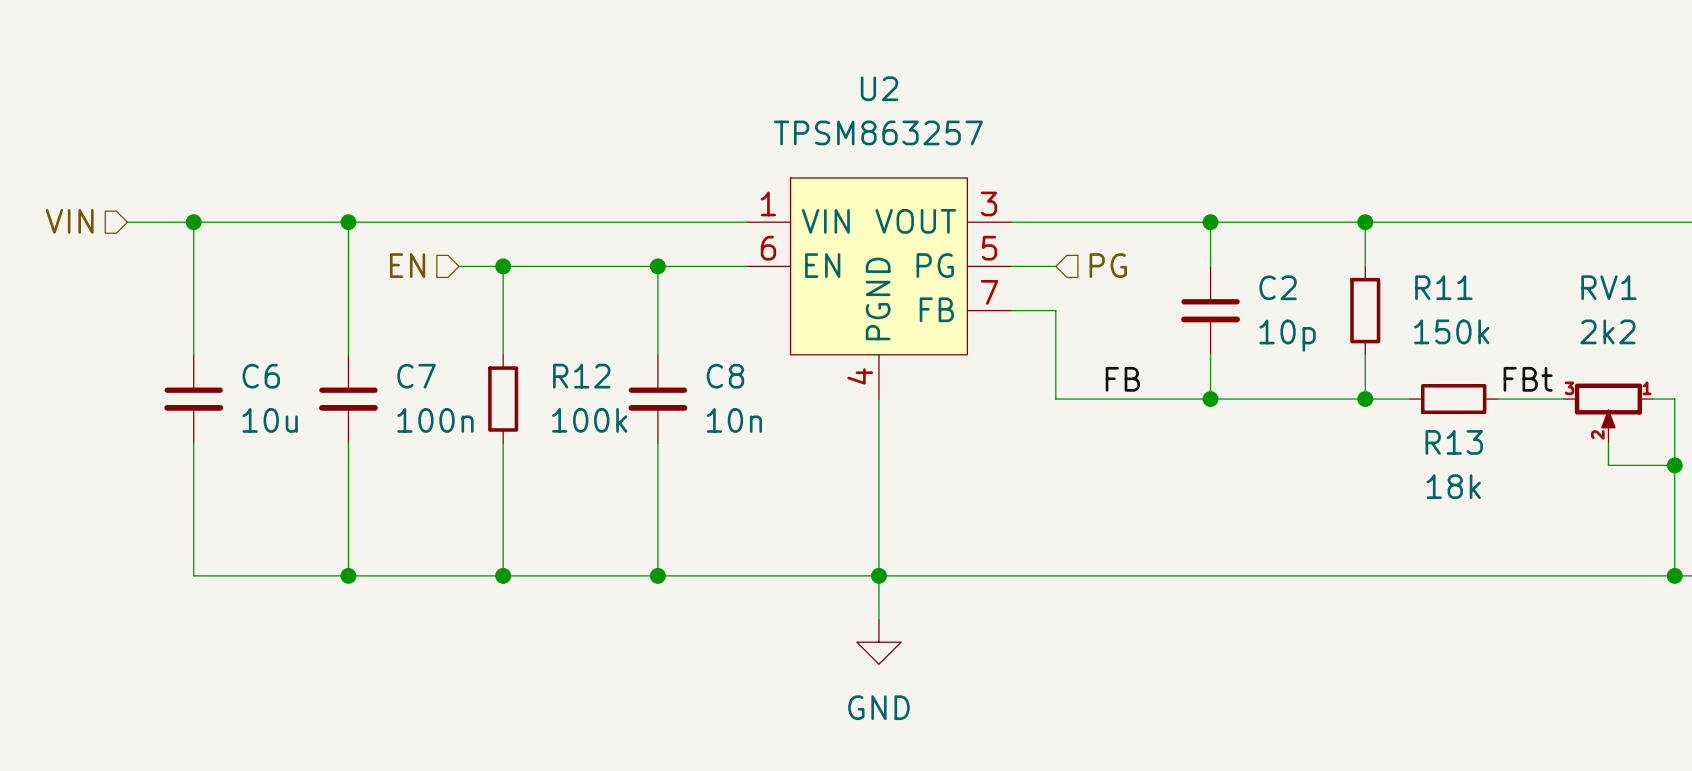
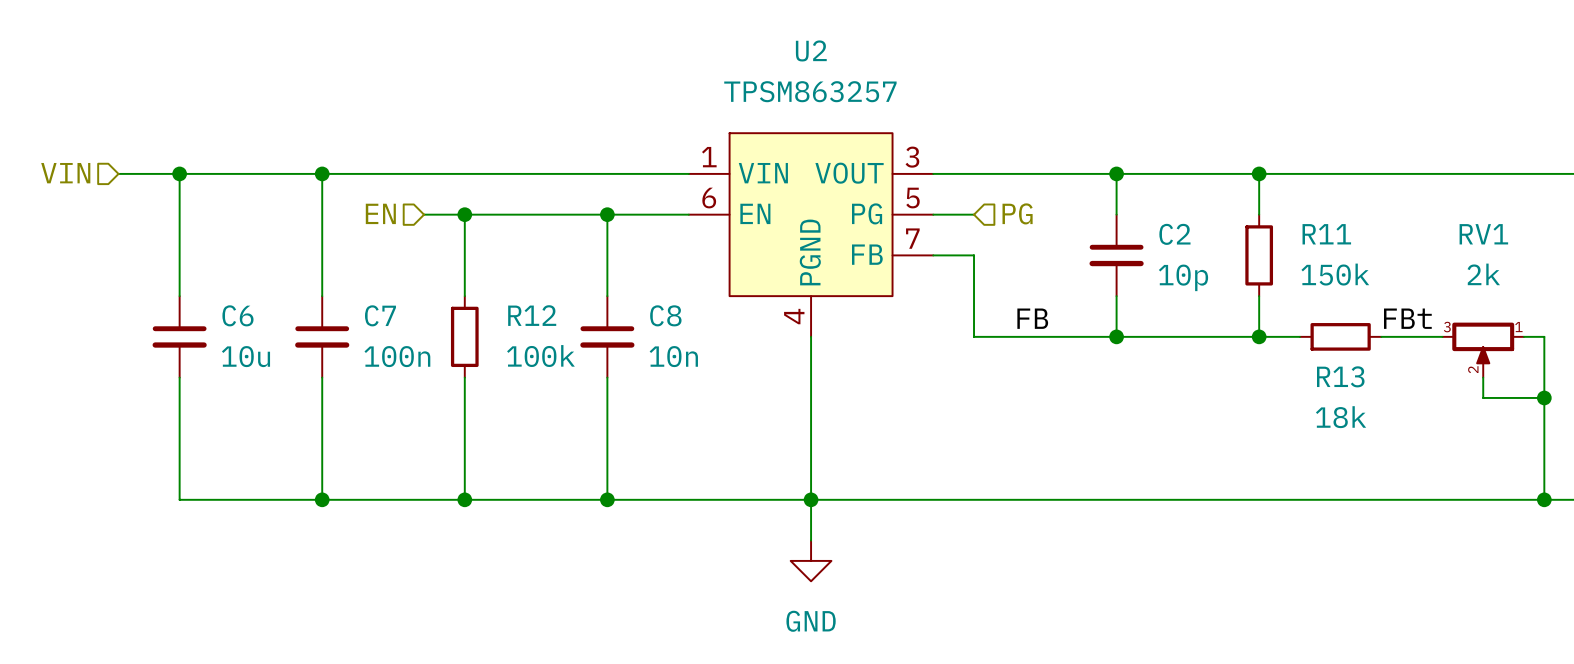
RV1 value: 2k2 (1607, 331) -> 2k (1483, 274)

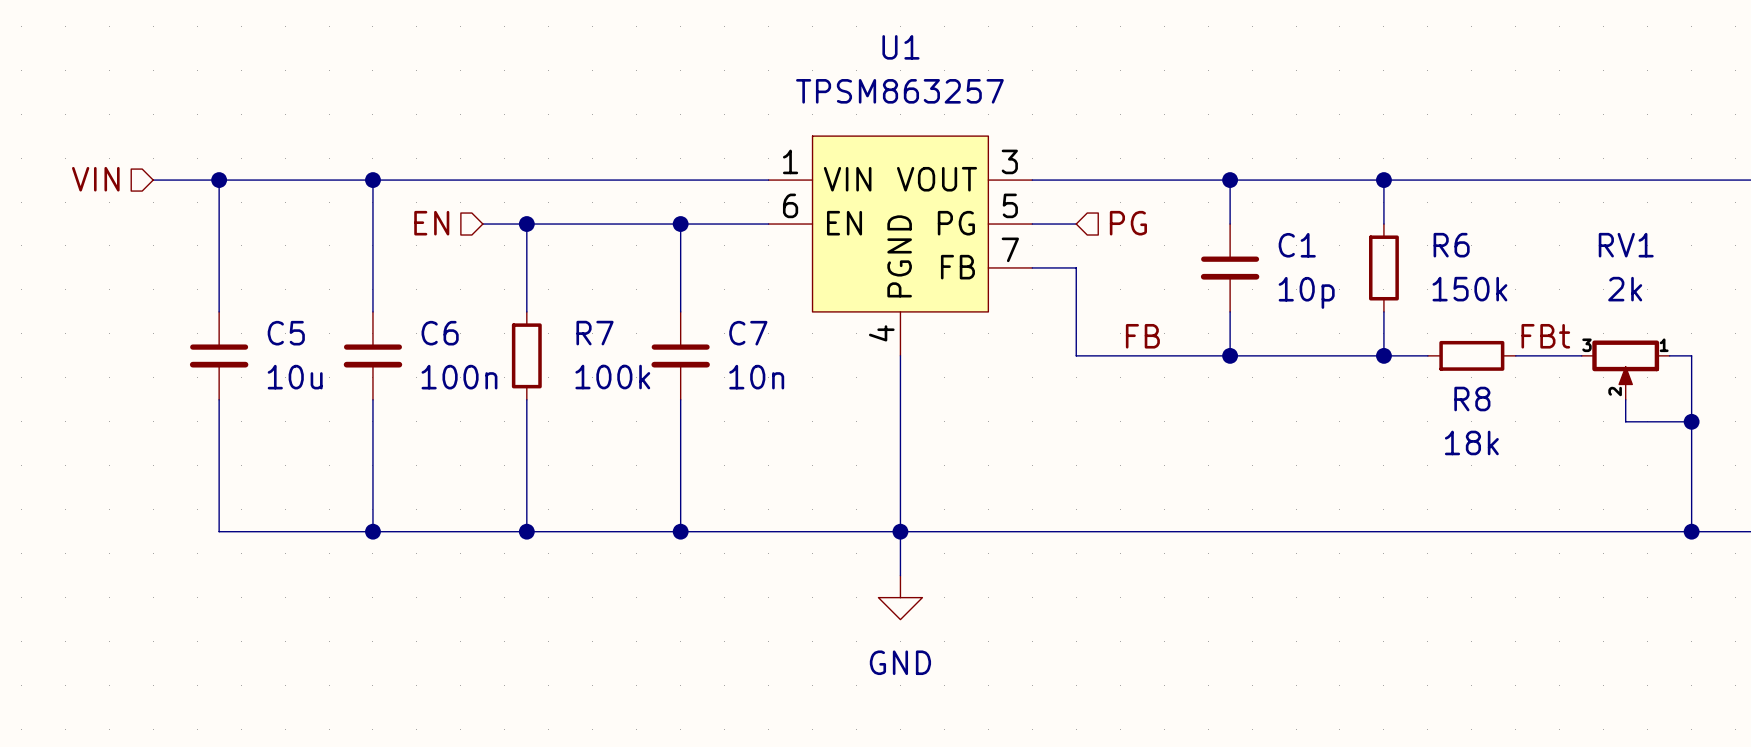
U2 name: U2 (811, 50) -> U1 (900, 47)
C2 name: C2 (1174, 234) -> C1 (1297, 245)
R11 name: R11 (1326, 234) -> R6 (1451, 245)
C6 name: C6 (237, 315) -> C5 (286, 333)
C7 name: C7 (380, 315) -> C6 (440, 333)
R12 name: R12 (532, 315) -> R7 (595, 333)
C8 name: C8 (665, 315) -> C7 (748, 333)
R13 name: R13 (1340, 376) -> R8 (1472, 399)

